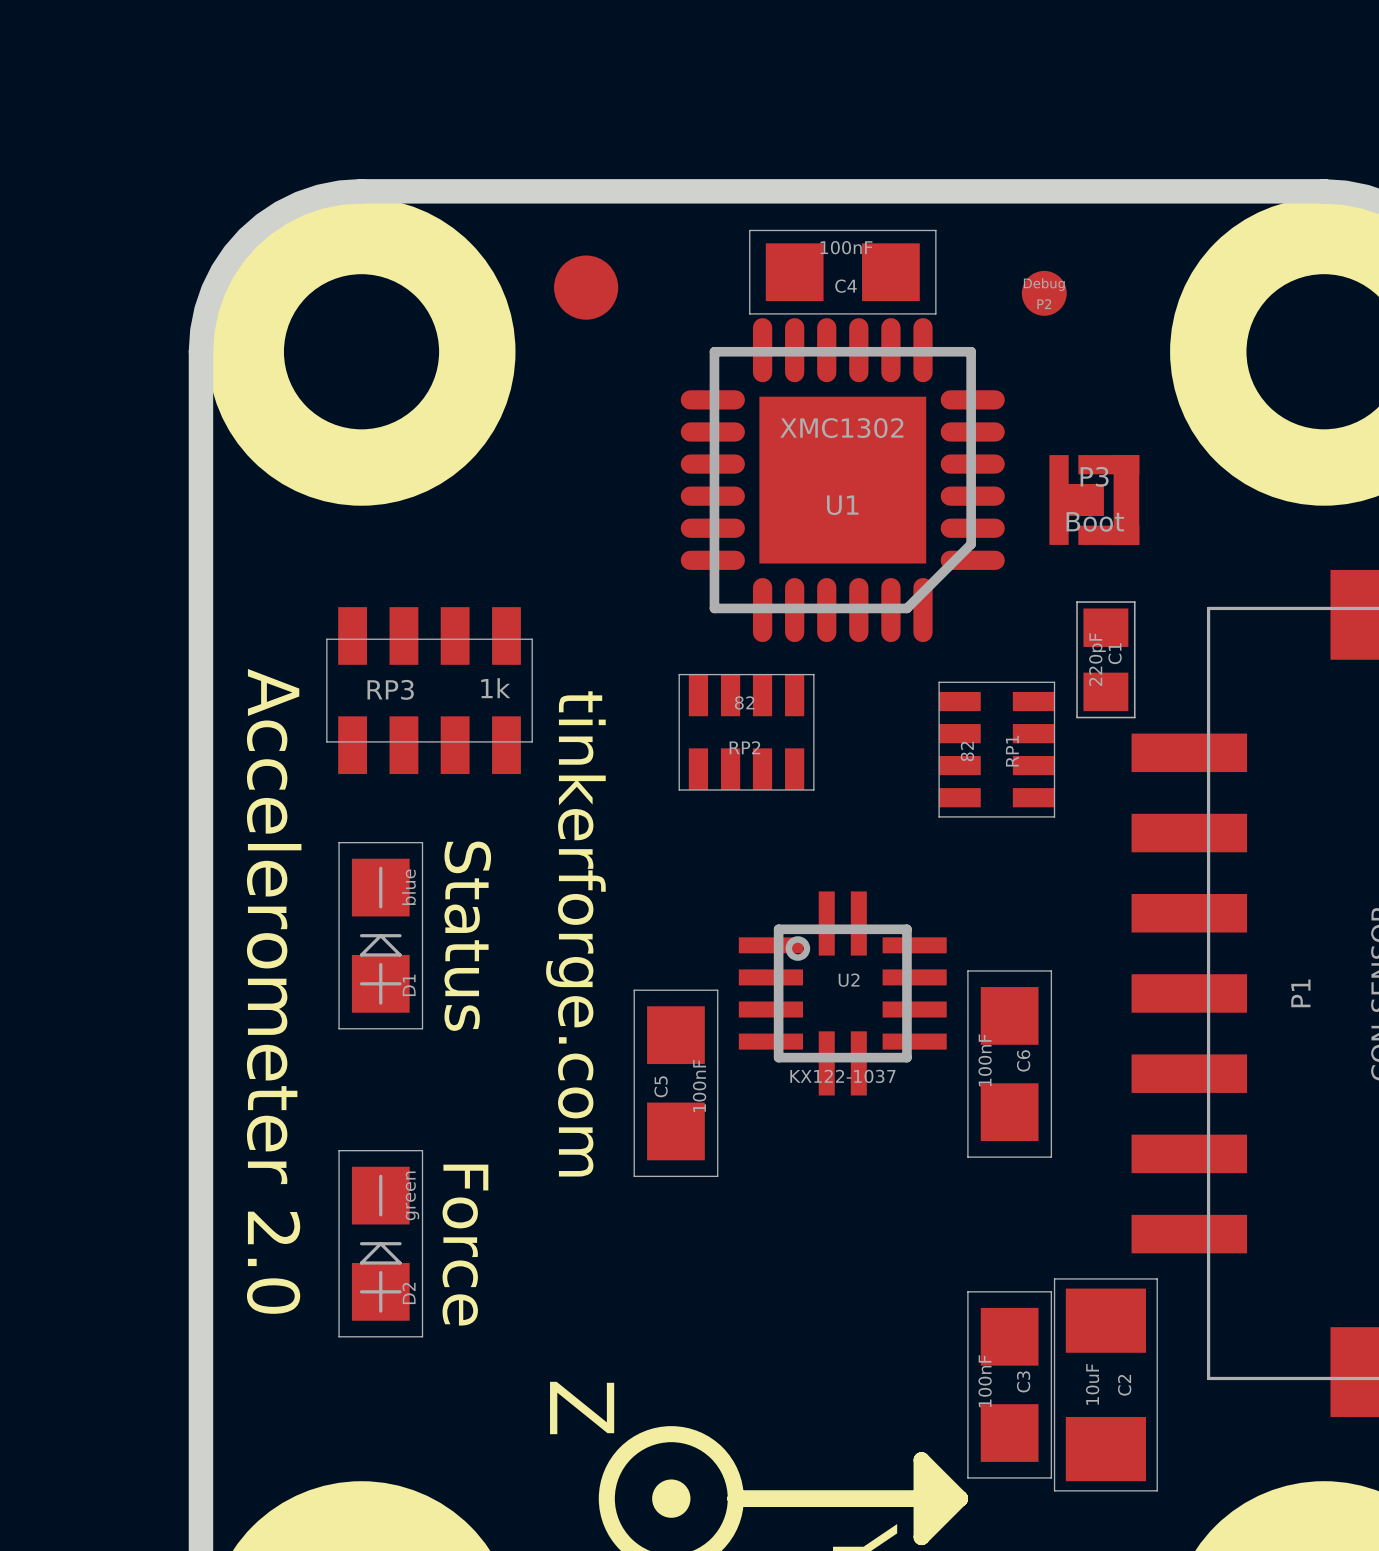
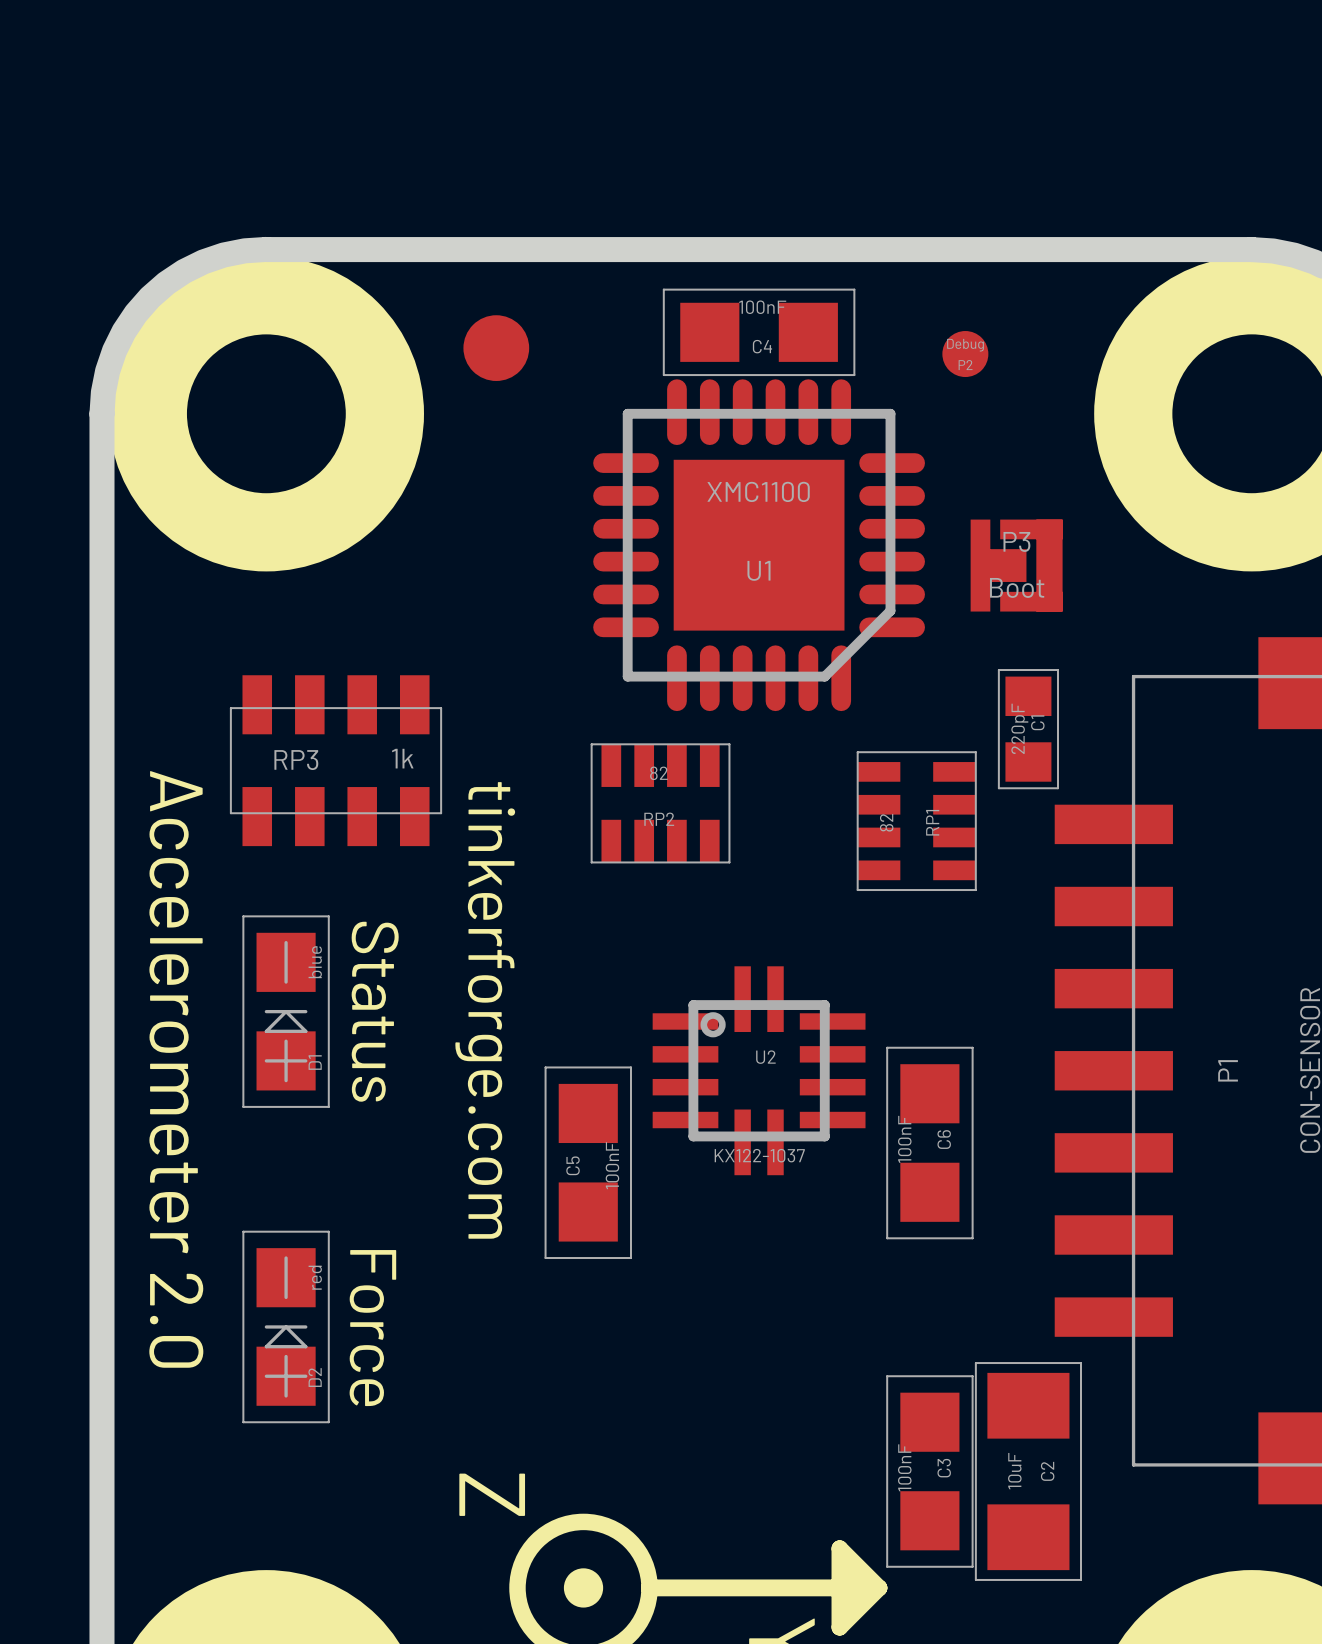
U1 value: XMC1302 (841, 428) -> XMC1100 (758, 491)
D2 value: green (412, 1195) -> red (315, 1277)

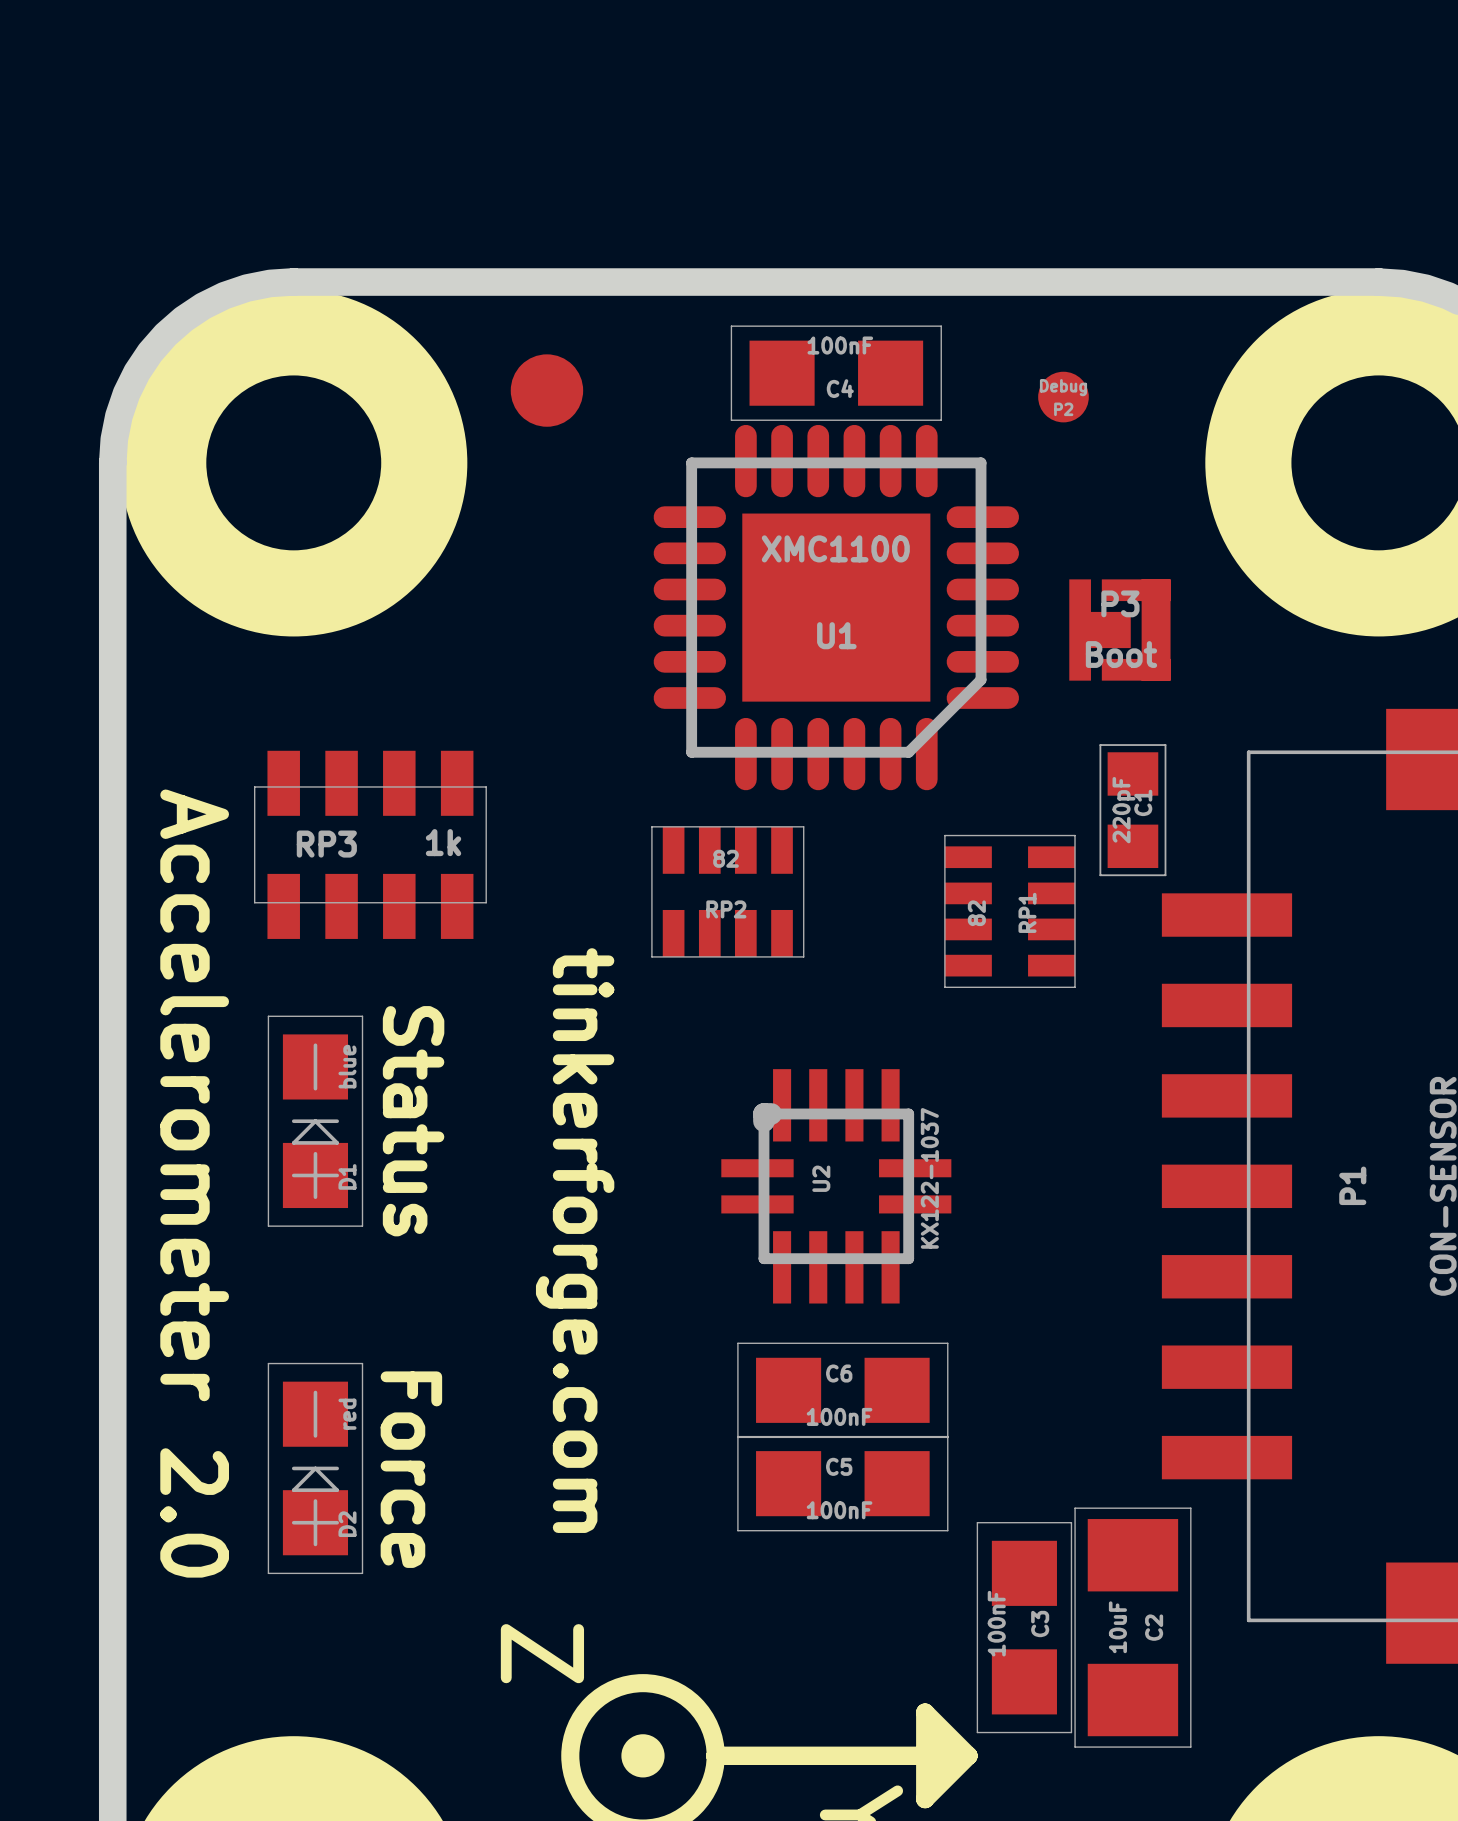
U2 footprint: [652, 966, 866, 1176] -> [721, 1069, 952, 1304]
text position: tinkerforge.com (485, 1010) -> tinkerforge.com (575, 1240)
U2 name rotation: 0° (765, 1057) -> 90° counterclockwise (821, 1178)
C6 rotation: 0° (929, 1143) -> 90° clockwise (842, 1390)
C6 position: (929, 1143) -> (842, 1390)
U2 value rotation: 0° (759, 1155) -> 90° counterclockwise (929, 1178)
C5 rotation: 0° (588, 1162) -> 90° clockwise (842, 1483)
C5 position: (588, 1162) -> (842, 1483)

